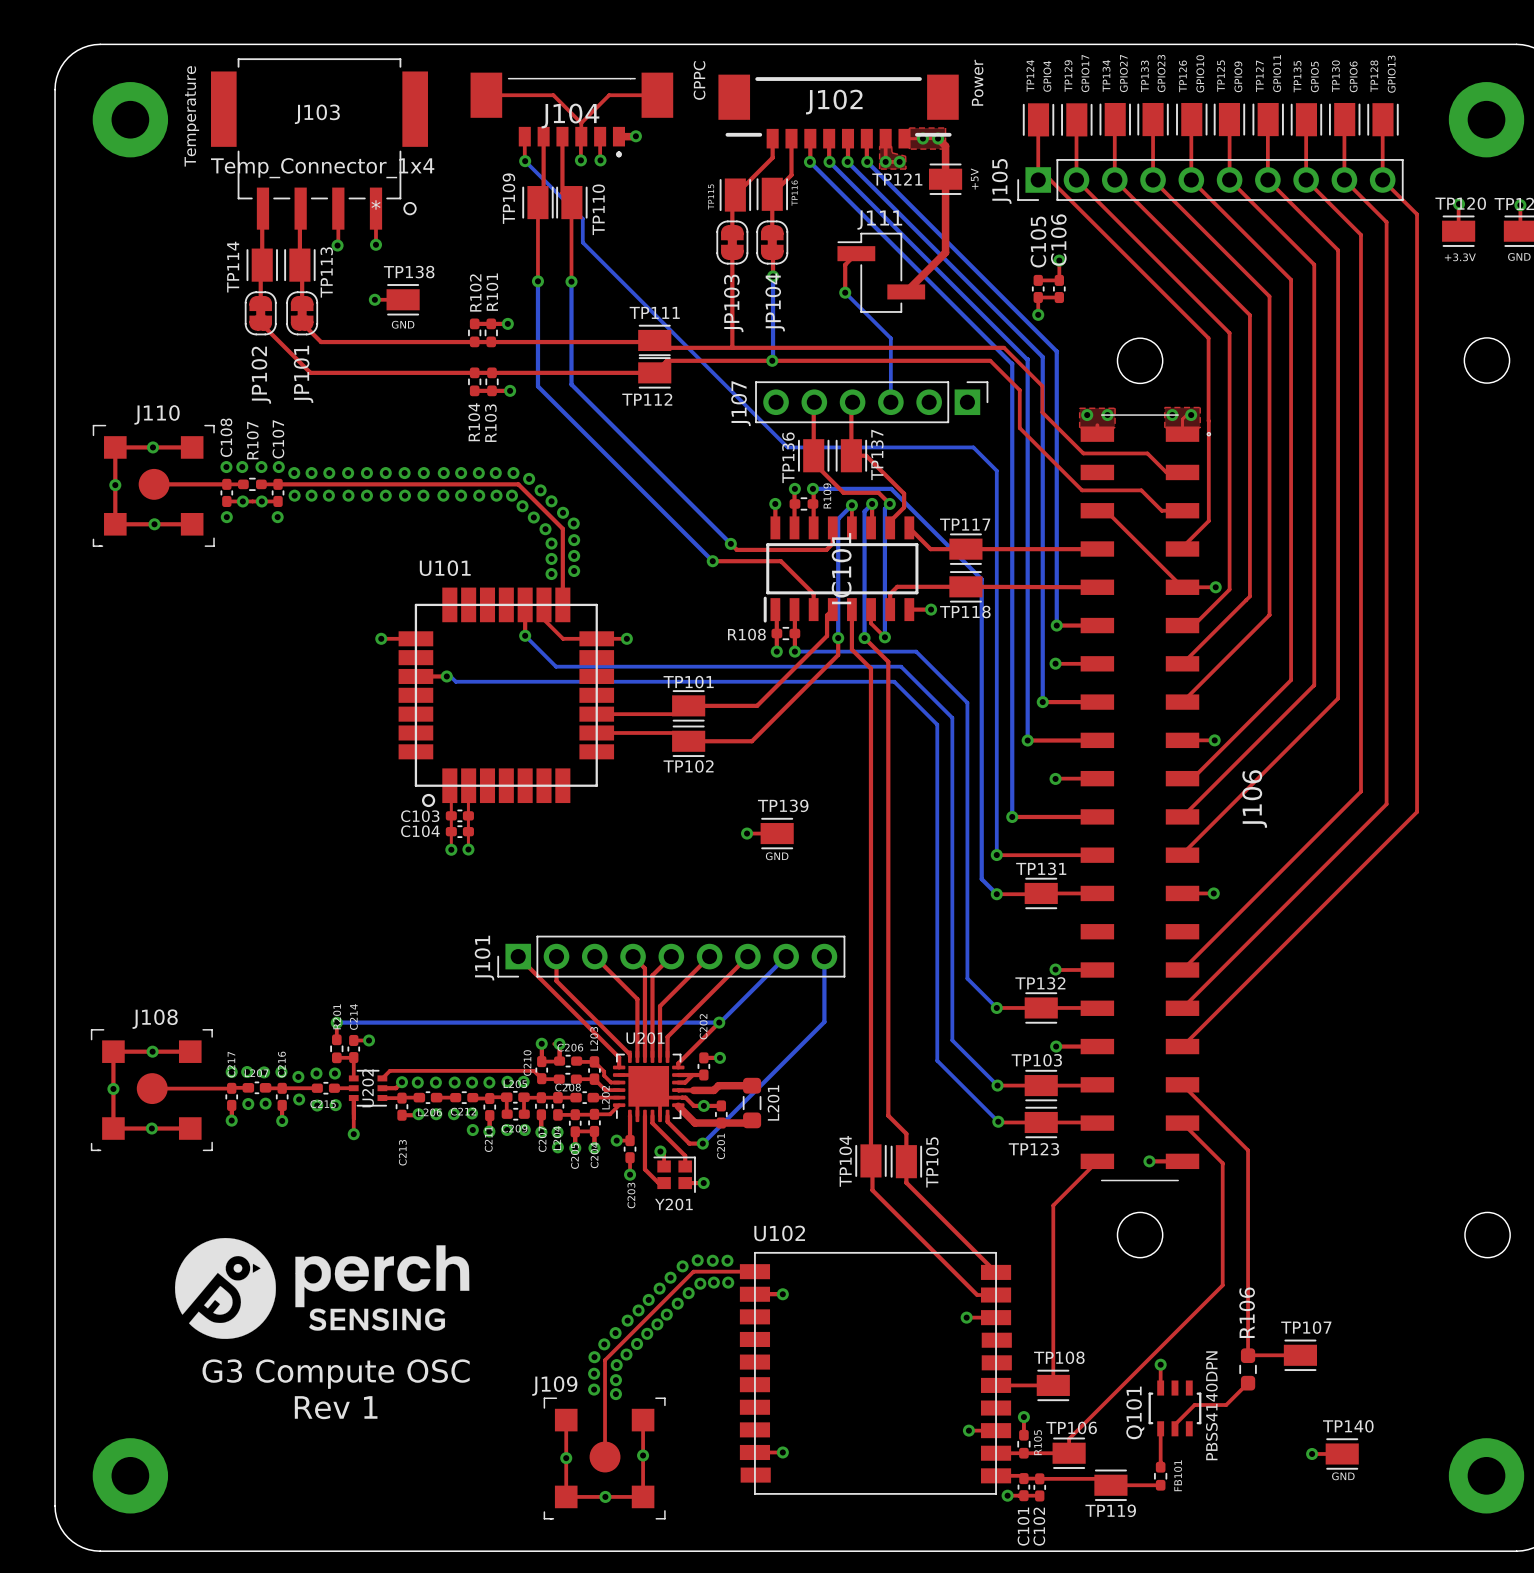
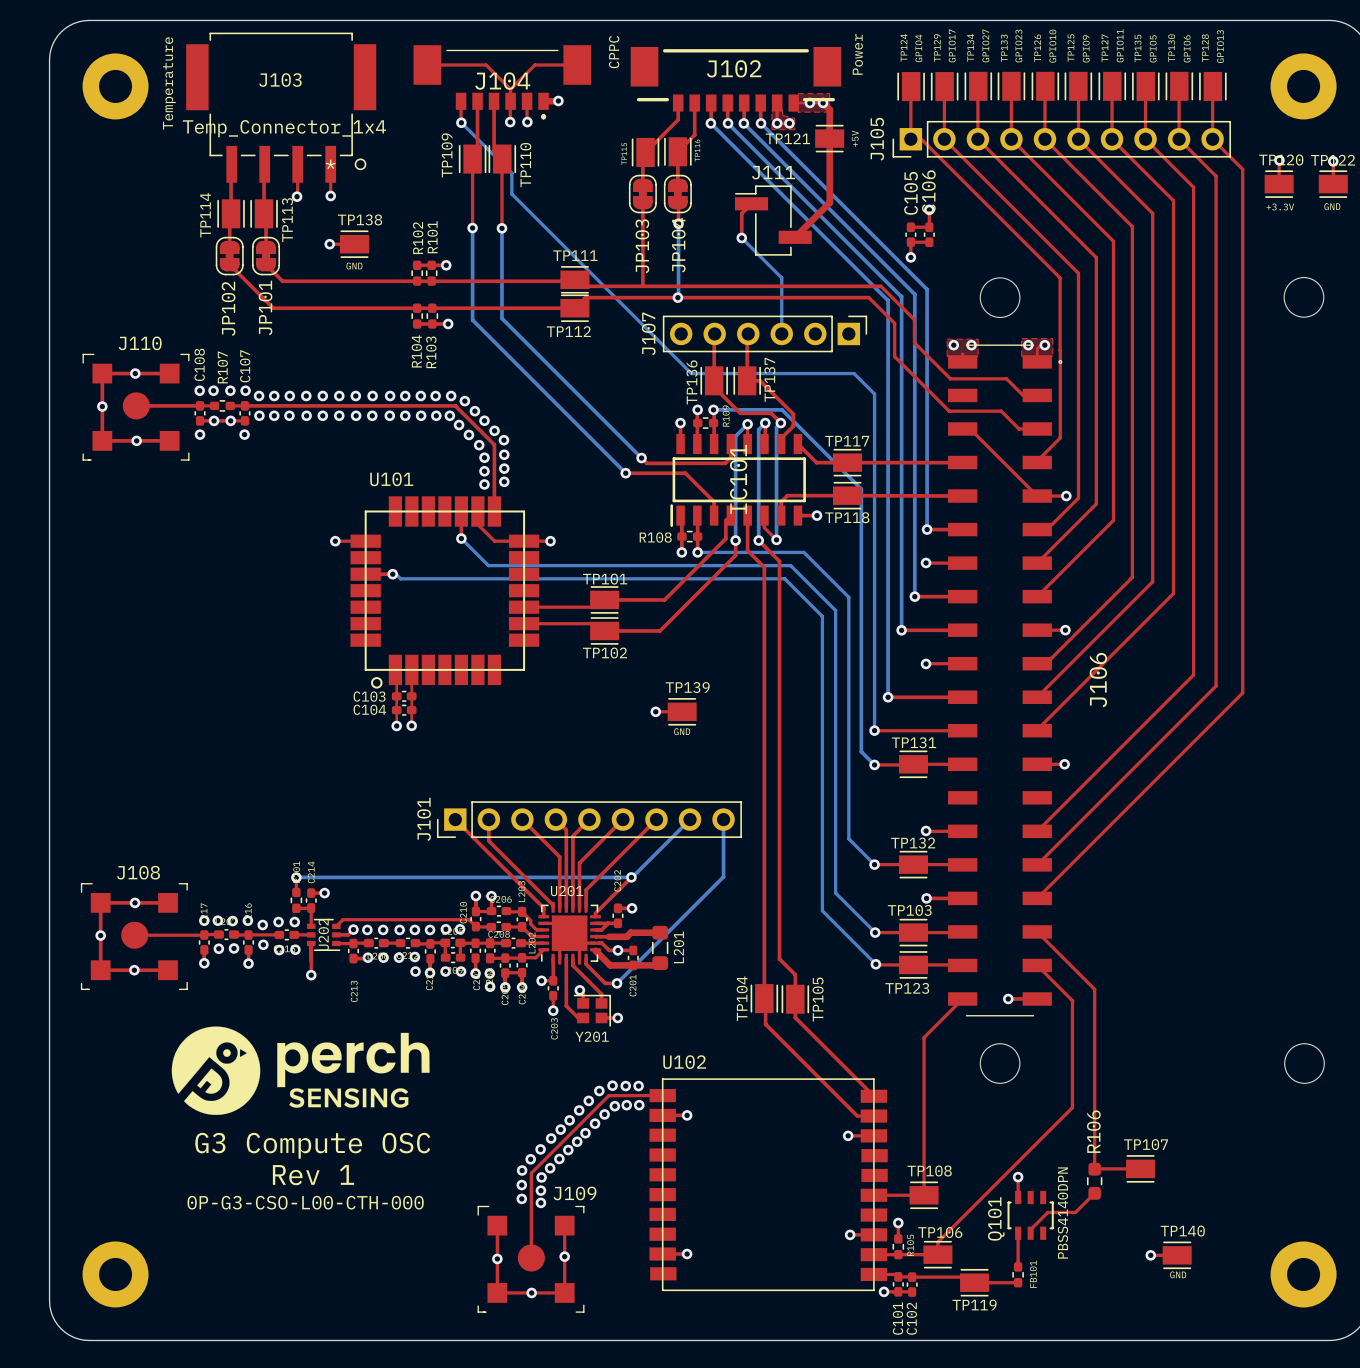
drawing position: (322, 1288) -> (300, 1070)
text position: G3 Compute OSC (336, 1374) -> G3 Compute OSC (312, 1145)
J109 name position: J109 (554, 1386) -> J109 (575, 1193)
text: none -> 0P-G3-CSO-L00-CTH-000 (305, 1202)
text position: Rev 1 (336, 1407) -> Rev 1 (313, 1175)

